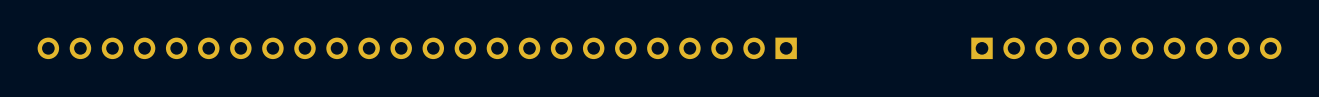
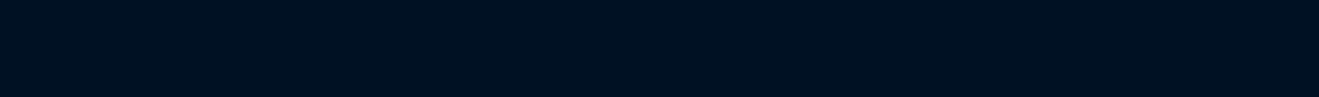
part: (417, 48) -> none
part: (1126, 48) -> none

